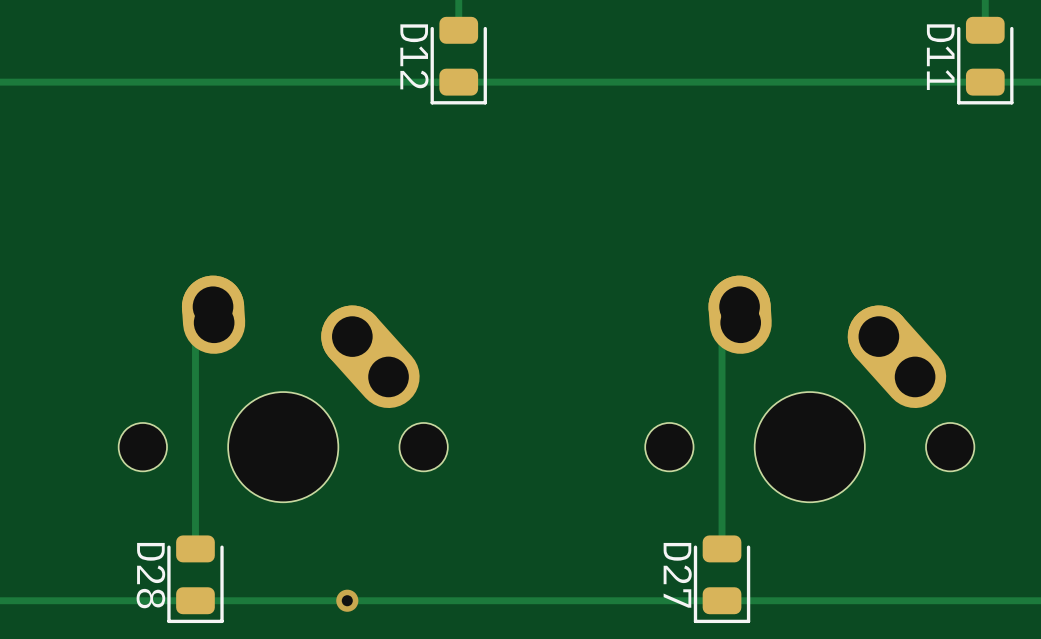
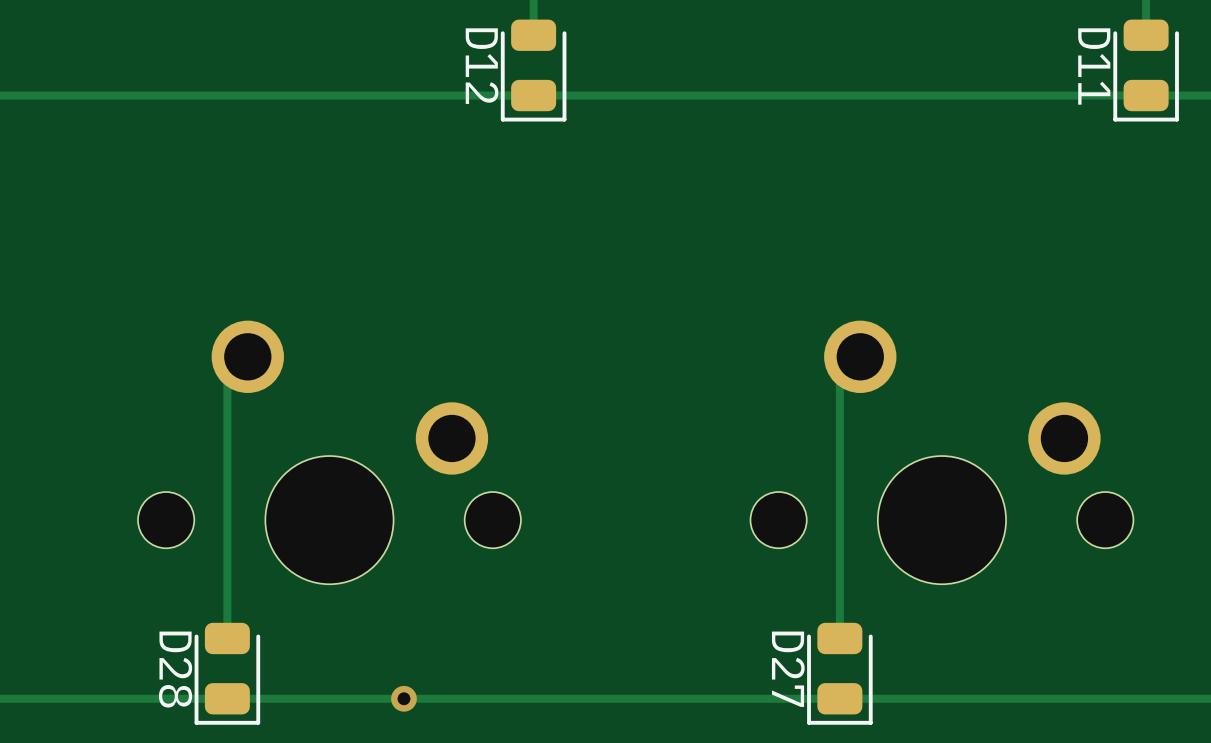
part footprint: [118, 275, 448, 503] -> [138, 320, 521, 585]
part footprint: [645, 275, 975, 503] -> [750, 320, 1134, 585]

